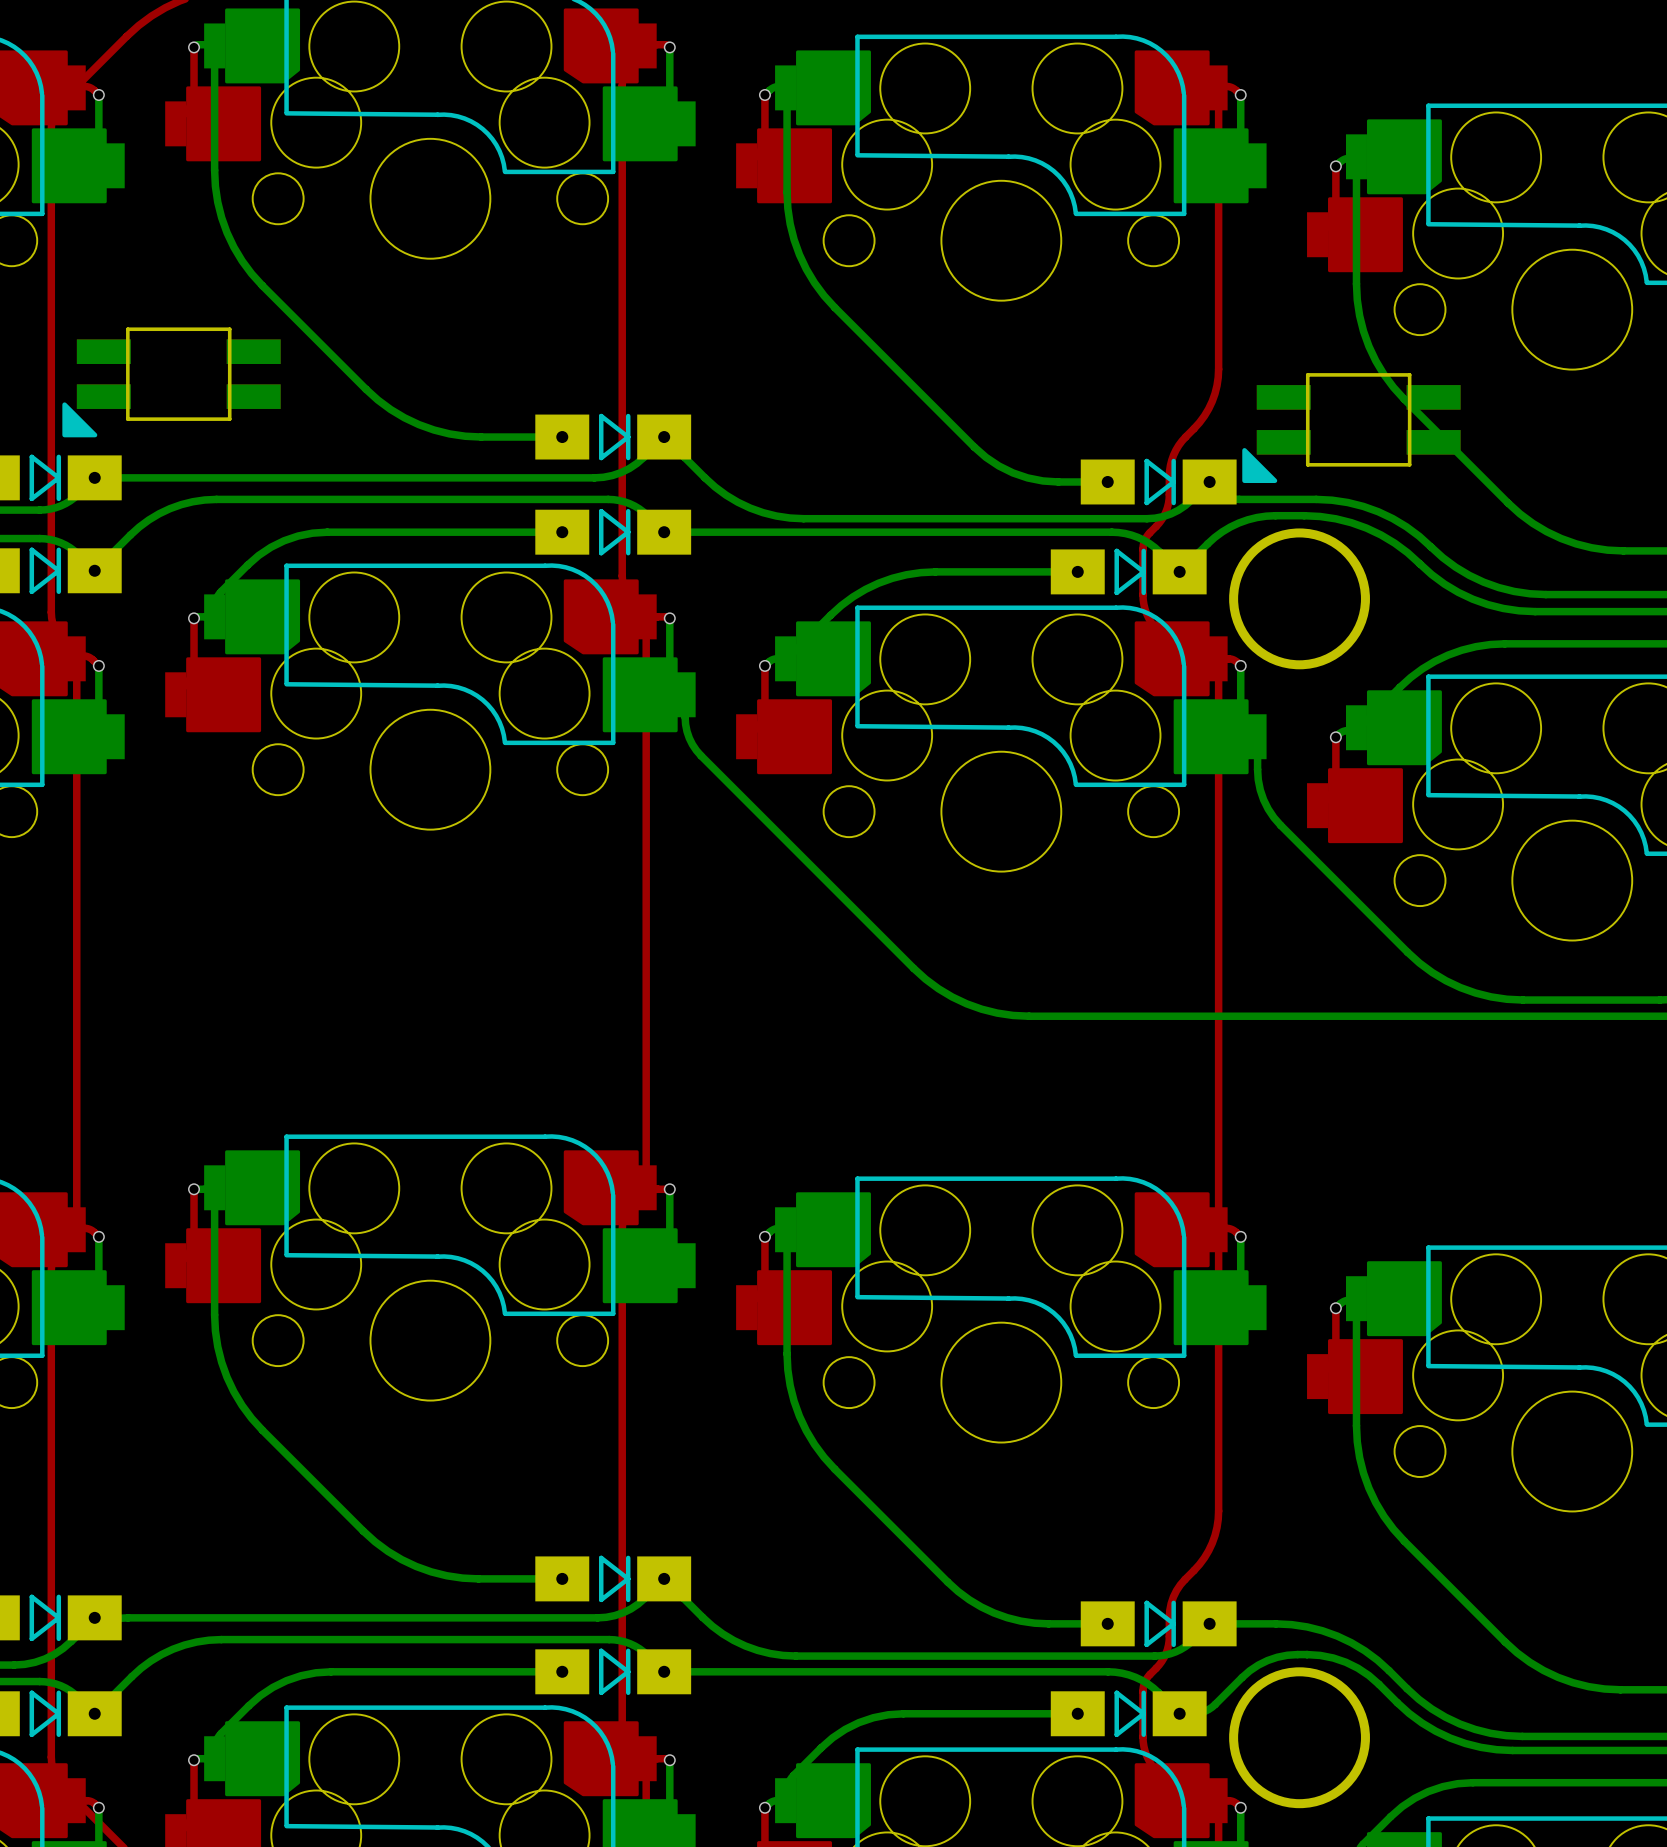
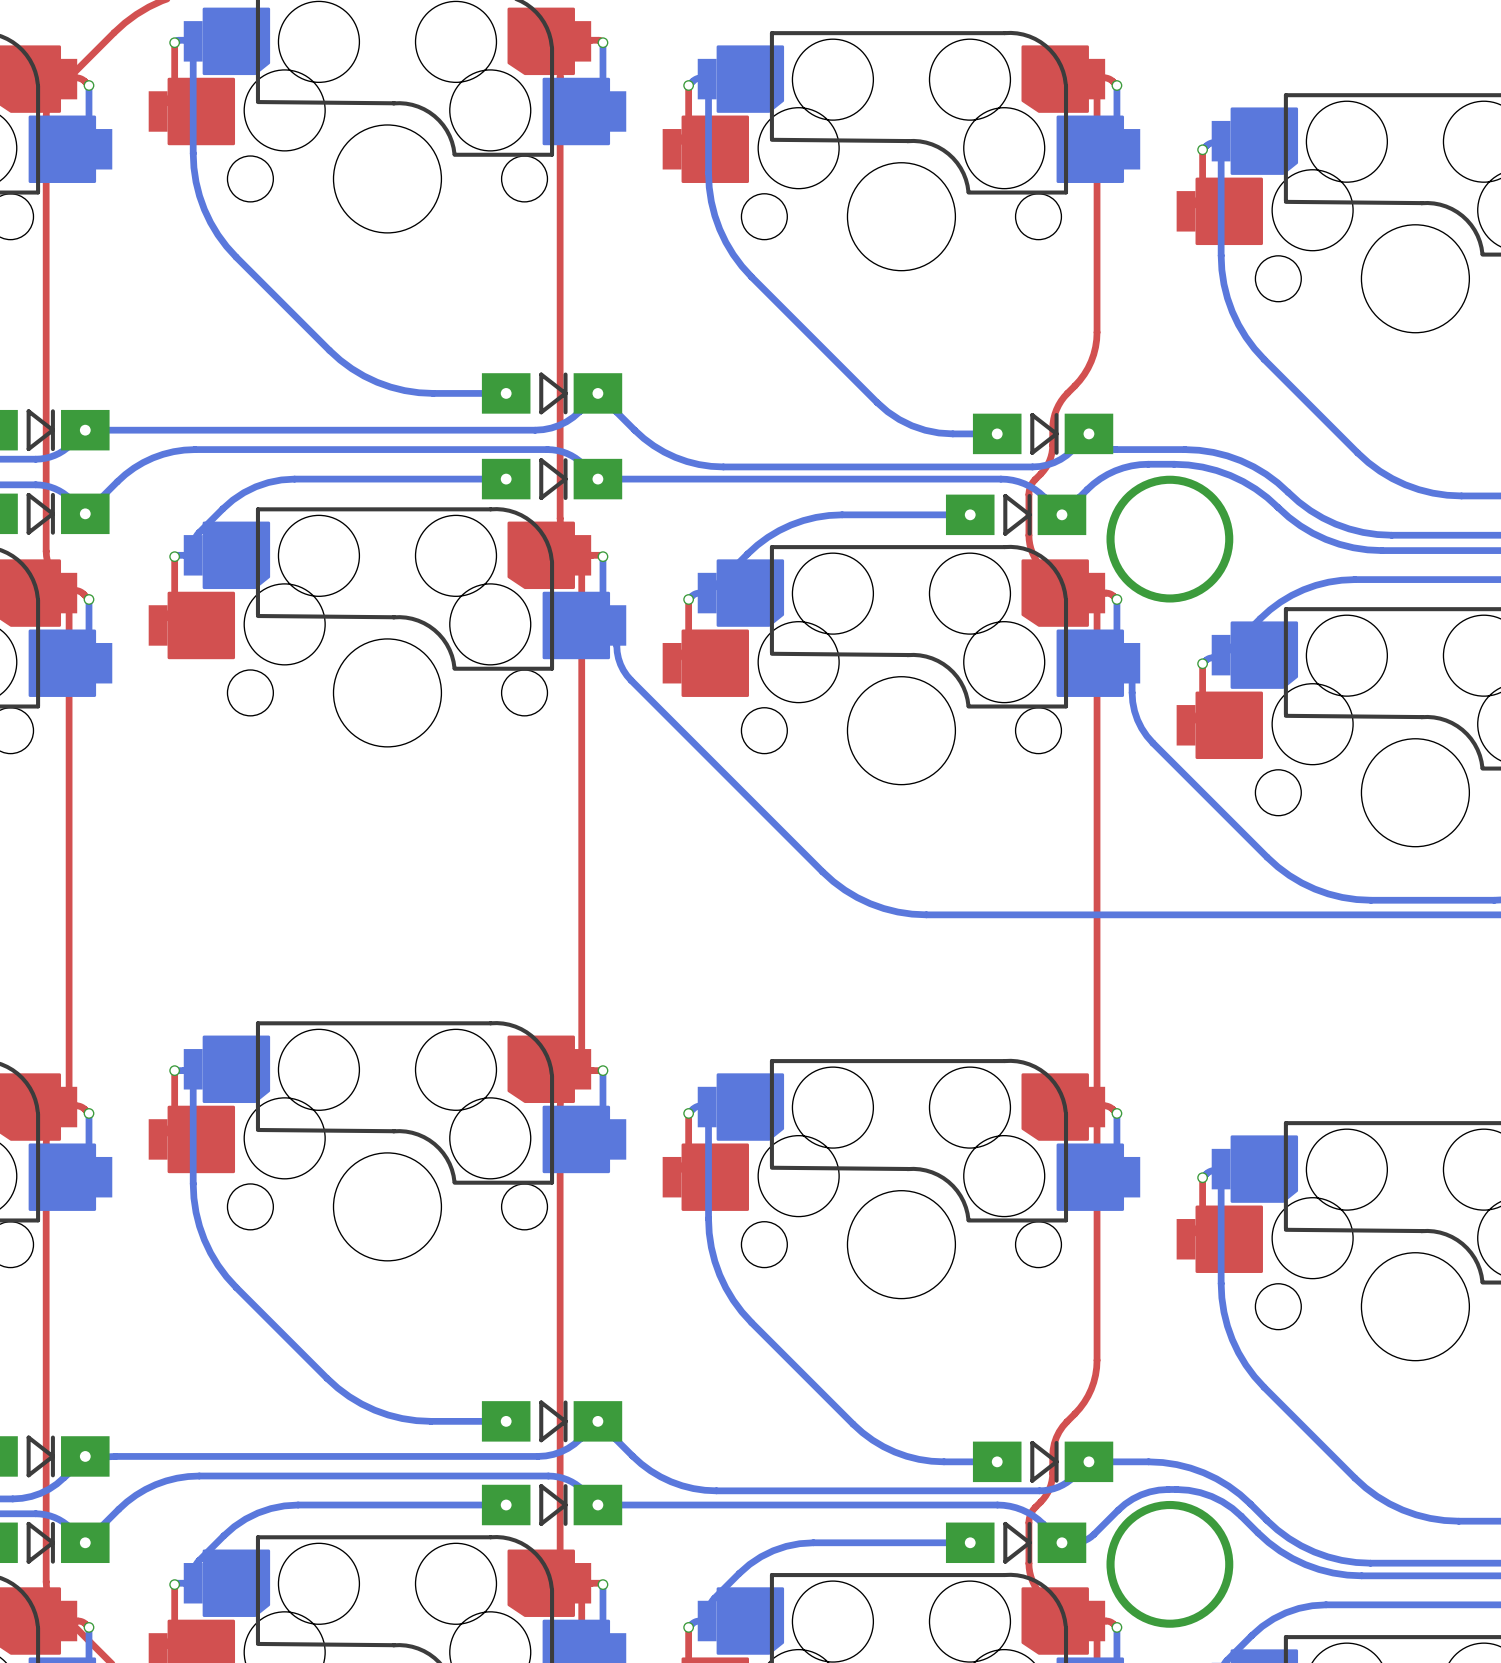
part: (171, 382) -> none
part: (1351, 428) -> none

